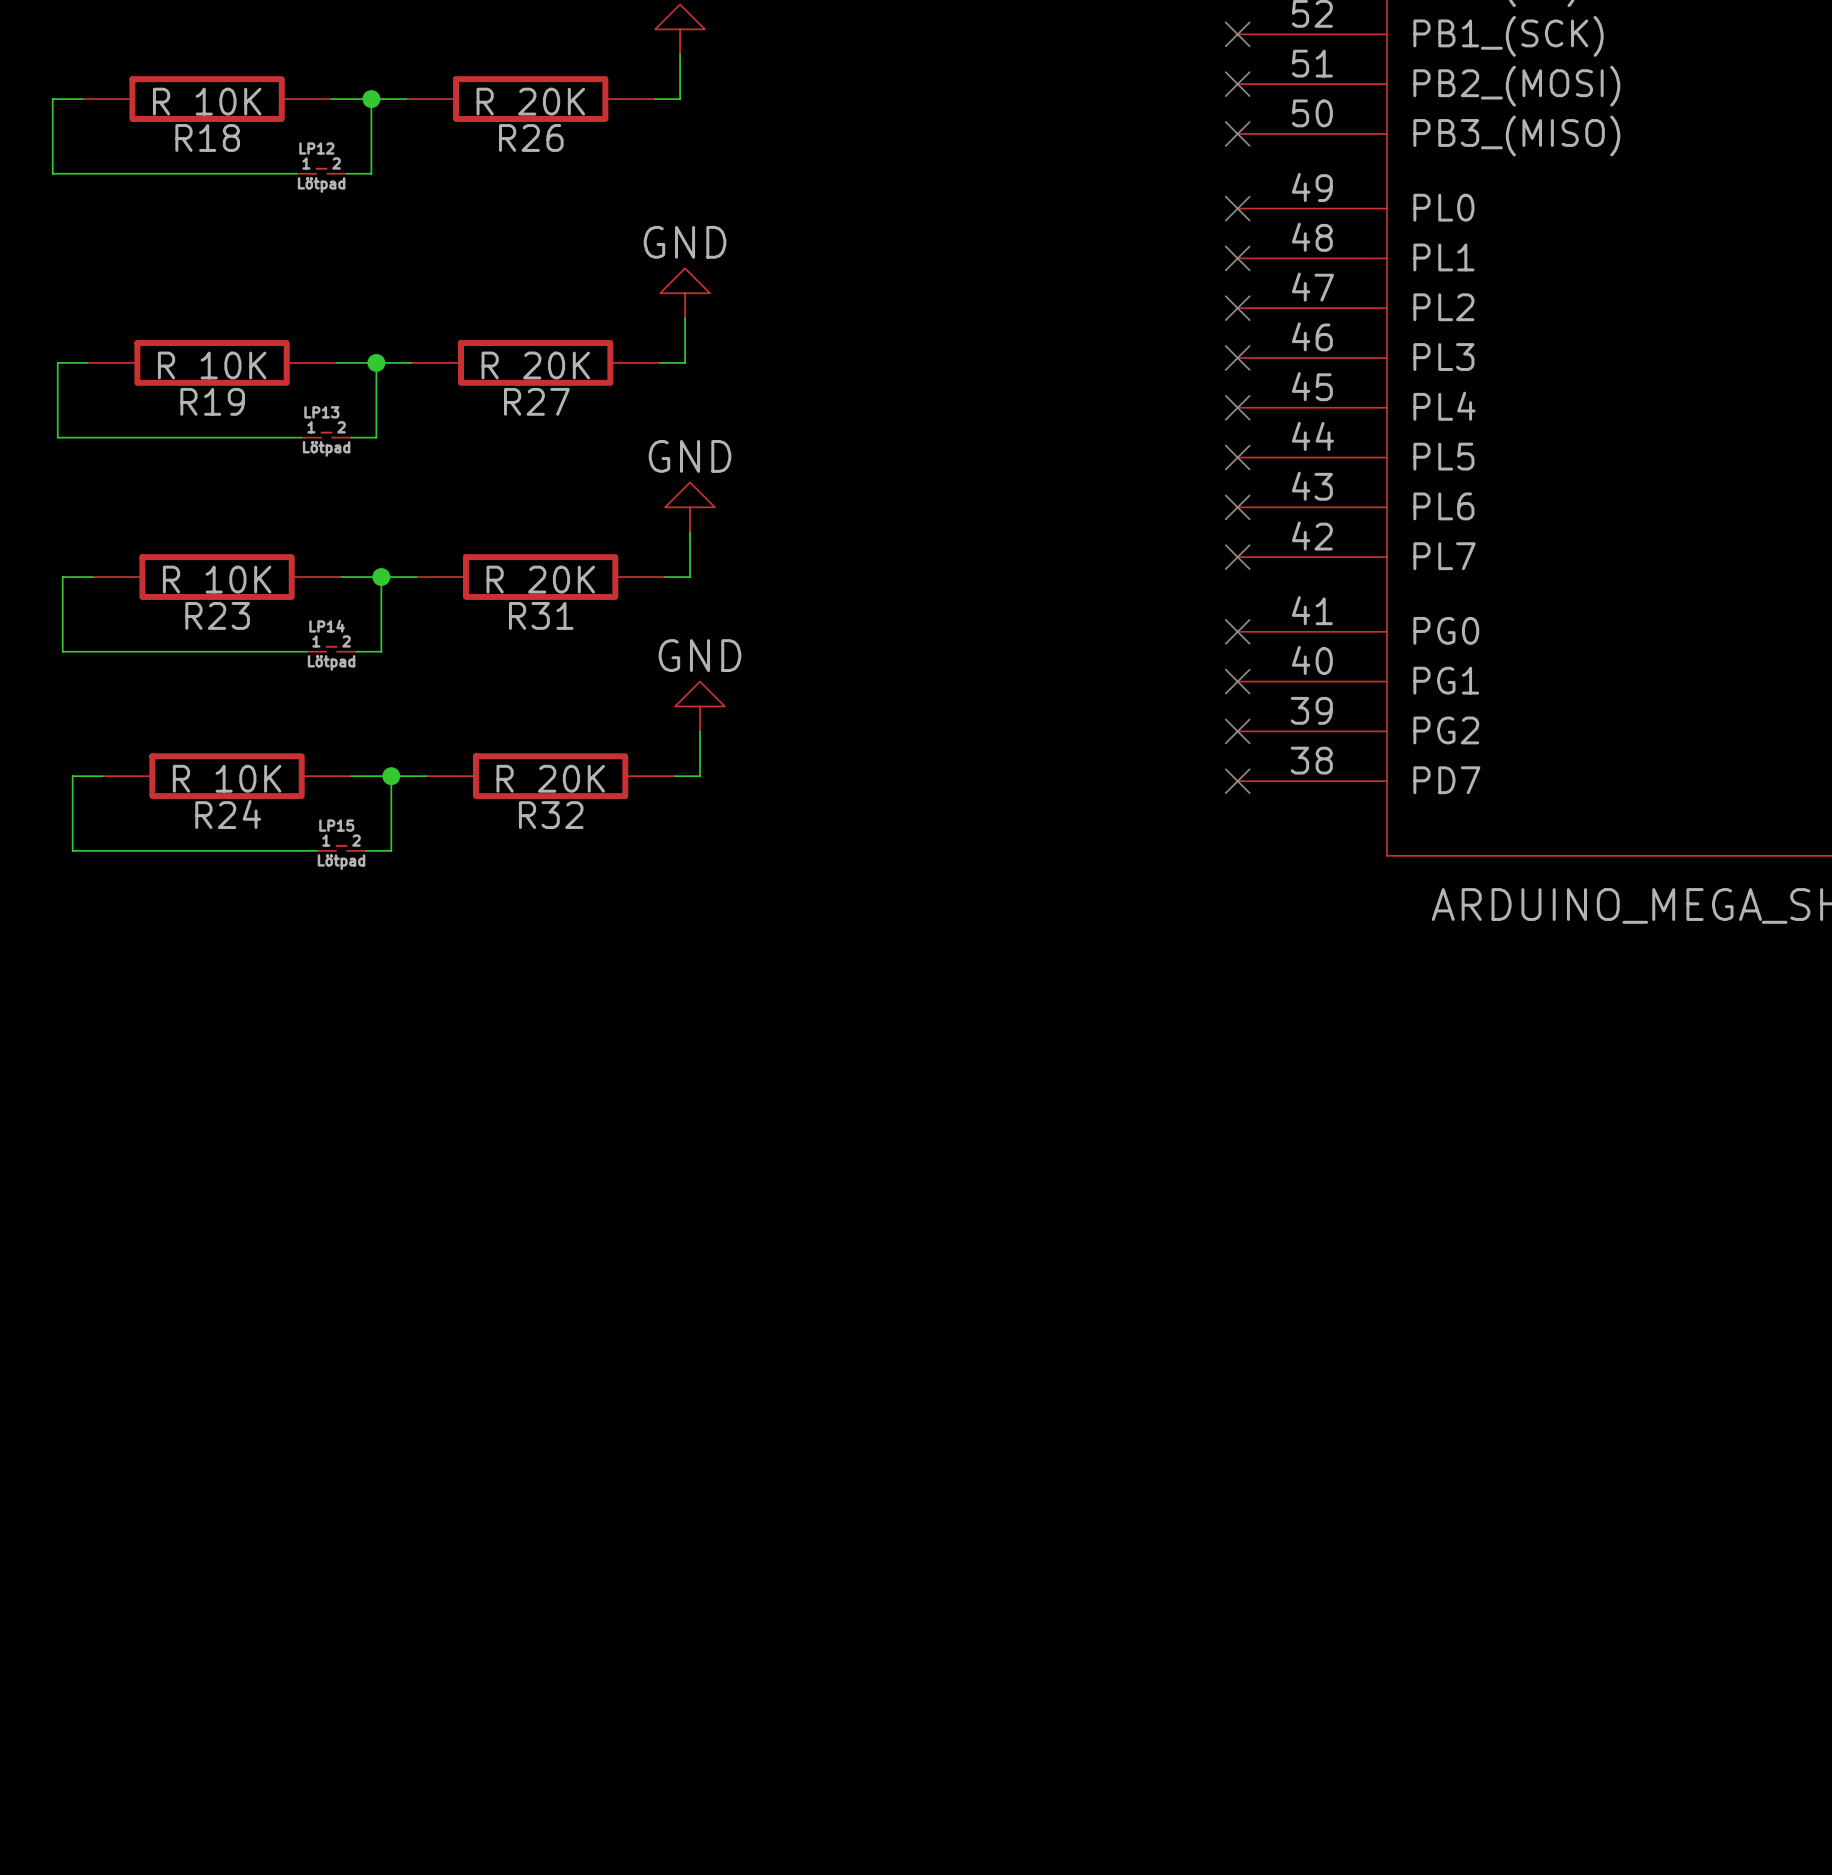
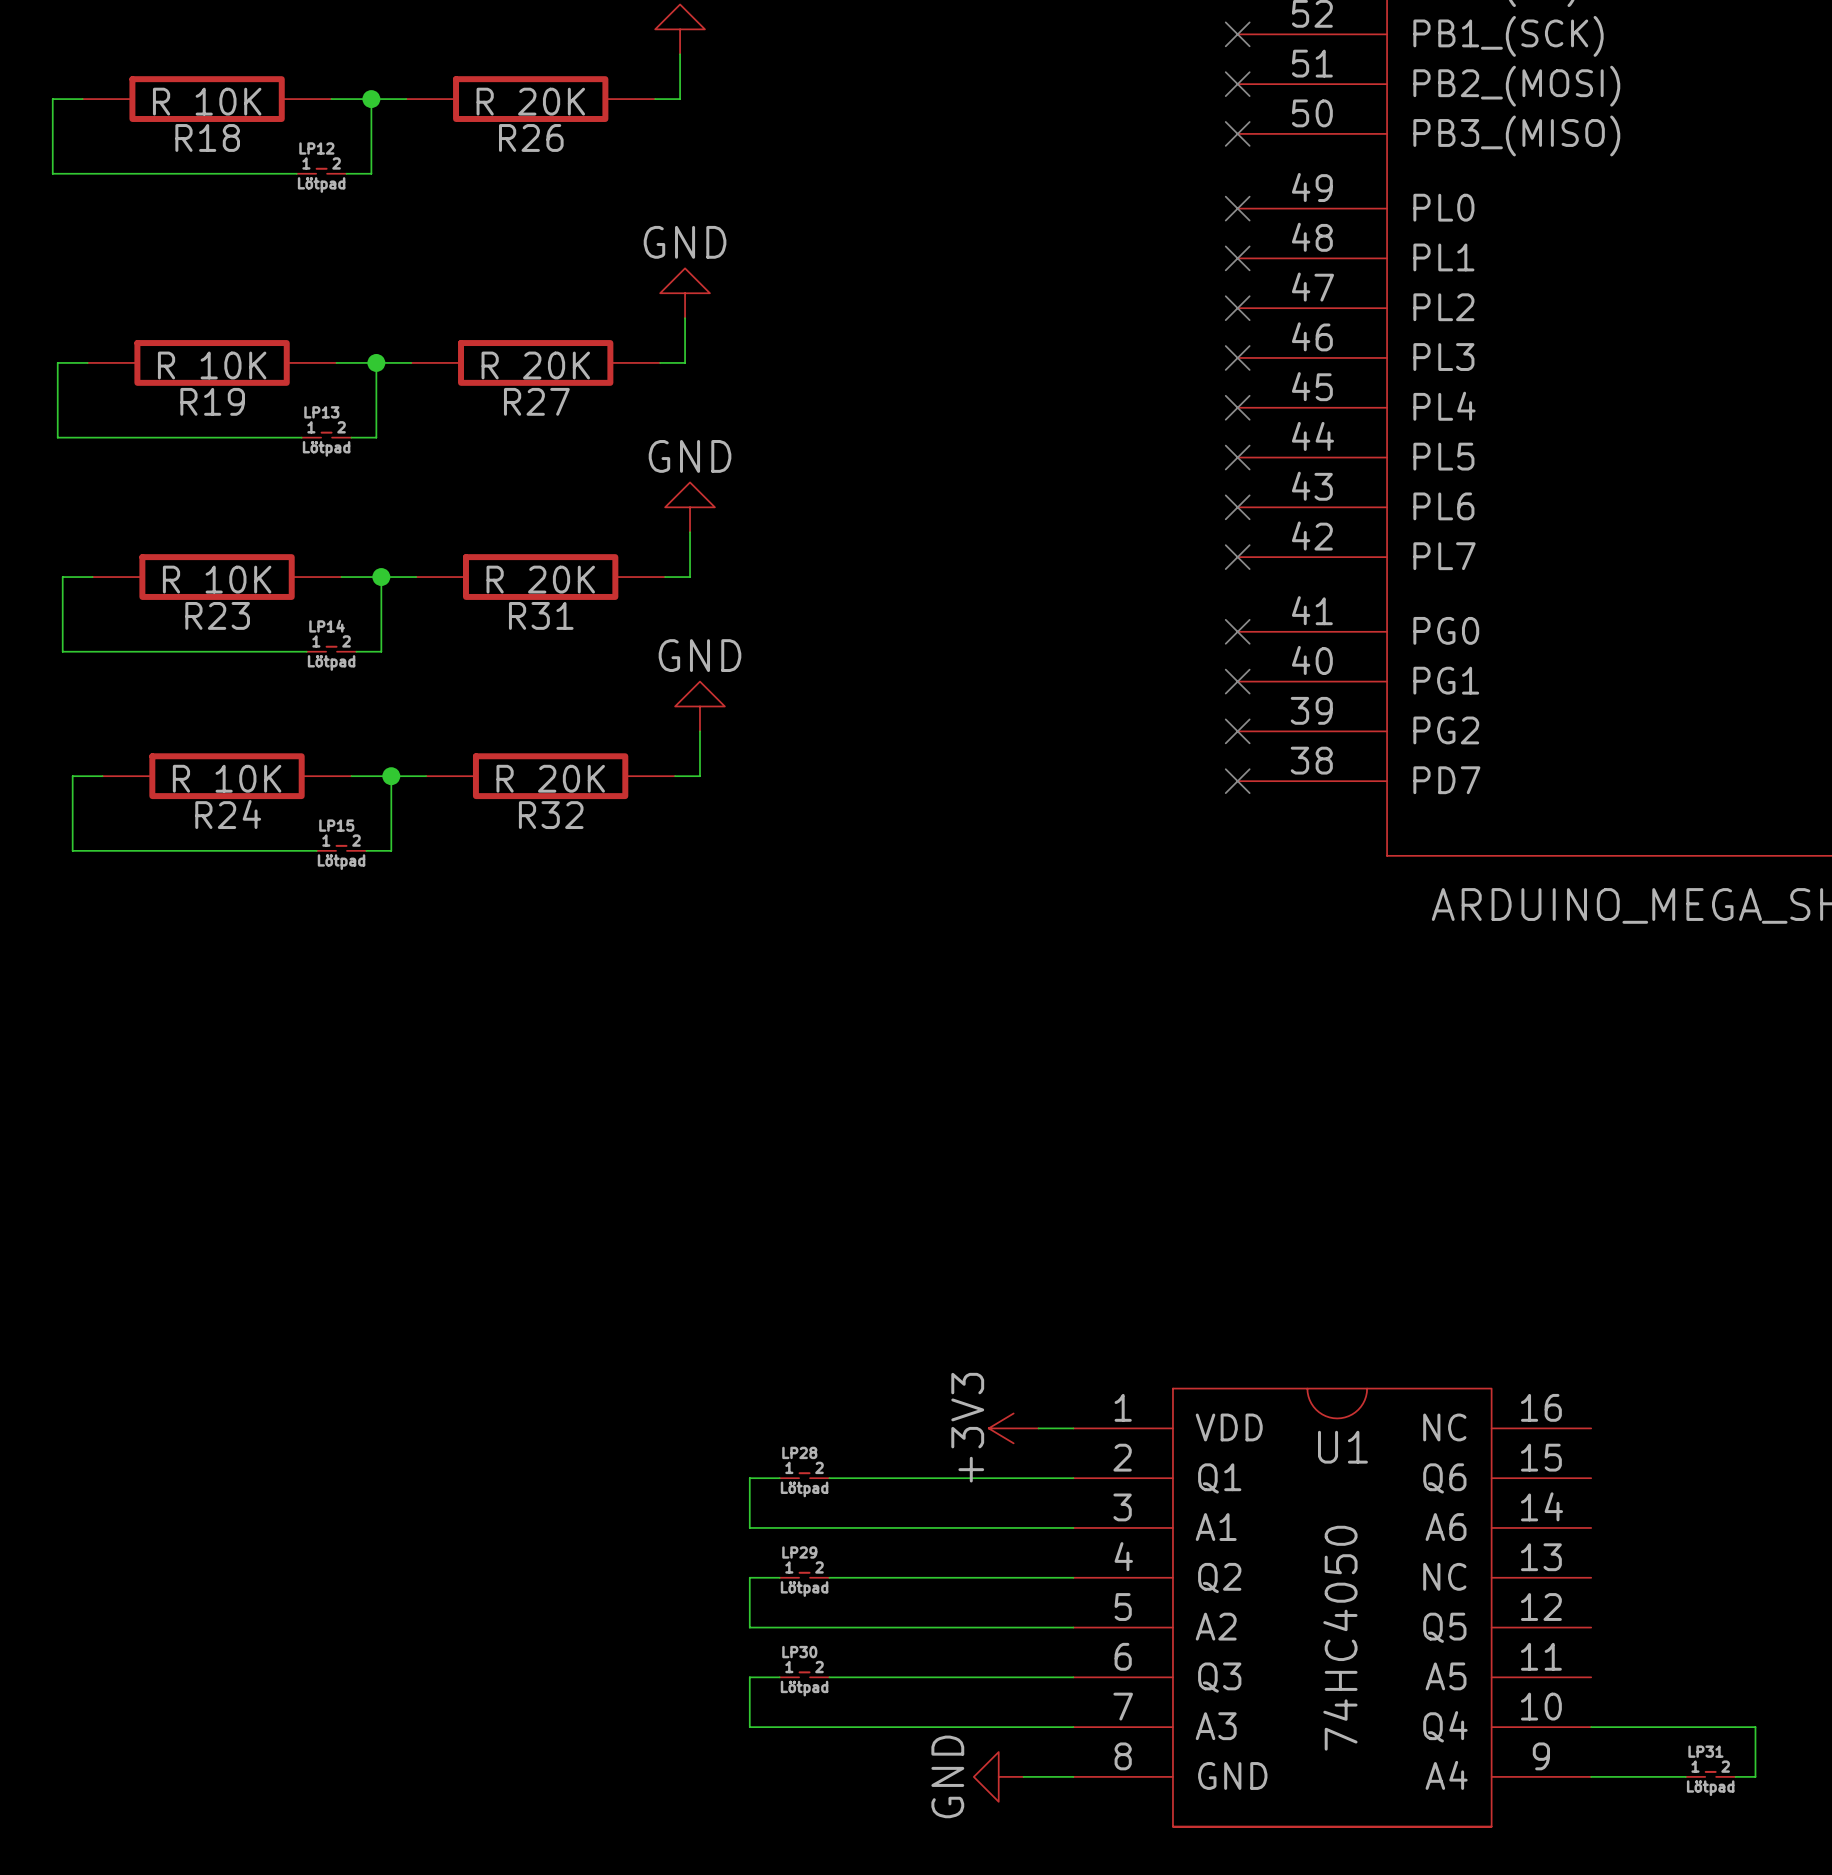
power symbol: none -> +3V3 (1013, 1428)
wire: none -> (1038, 1428) (1073, 1428)
LP28: none -> Lötpad (804, 1475)
wire: none -> (779, 1478) (749, 1478) (749, 1527) (1073, 1527)
wire: none -> (829, 1478) (1073, 1478)
LP29: none -> Lötpad (804, 1574)
wire: none -> (779, 1577) (749, 1577) (749, 1627) (1073, 1627)
wire: none -> (829, 1577) (1073, 1577)
U1: none -> 74HC4050 (1332, 1607)
LP30: none -> Lötpad (804, 1674)
wire: none -> (779, 1677) (749, 1677) (749, 1727) (1073, 1727)
wire: none -> (829, 1677) (1073, 1677)
wire: none -> (1591, 1727) (1755, 1727) (1755, 1776) (1735, 1776)
LP31: none -> Lötpad (1710, 1773)
power symbol: none -> GND (998, 1776)
wire: none -> (1023, 1776) (1073, 1776)
wire: none -> (1591, 1776) (1685, 1776)

